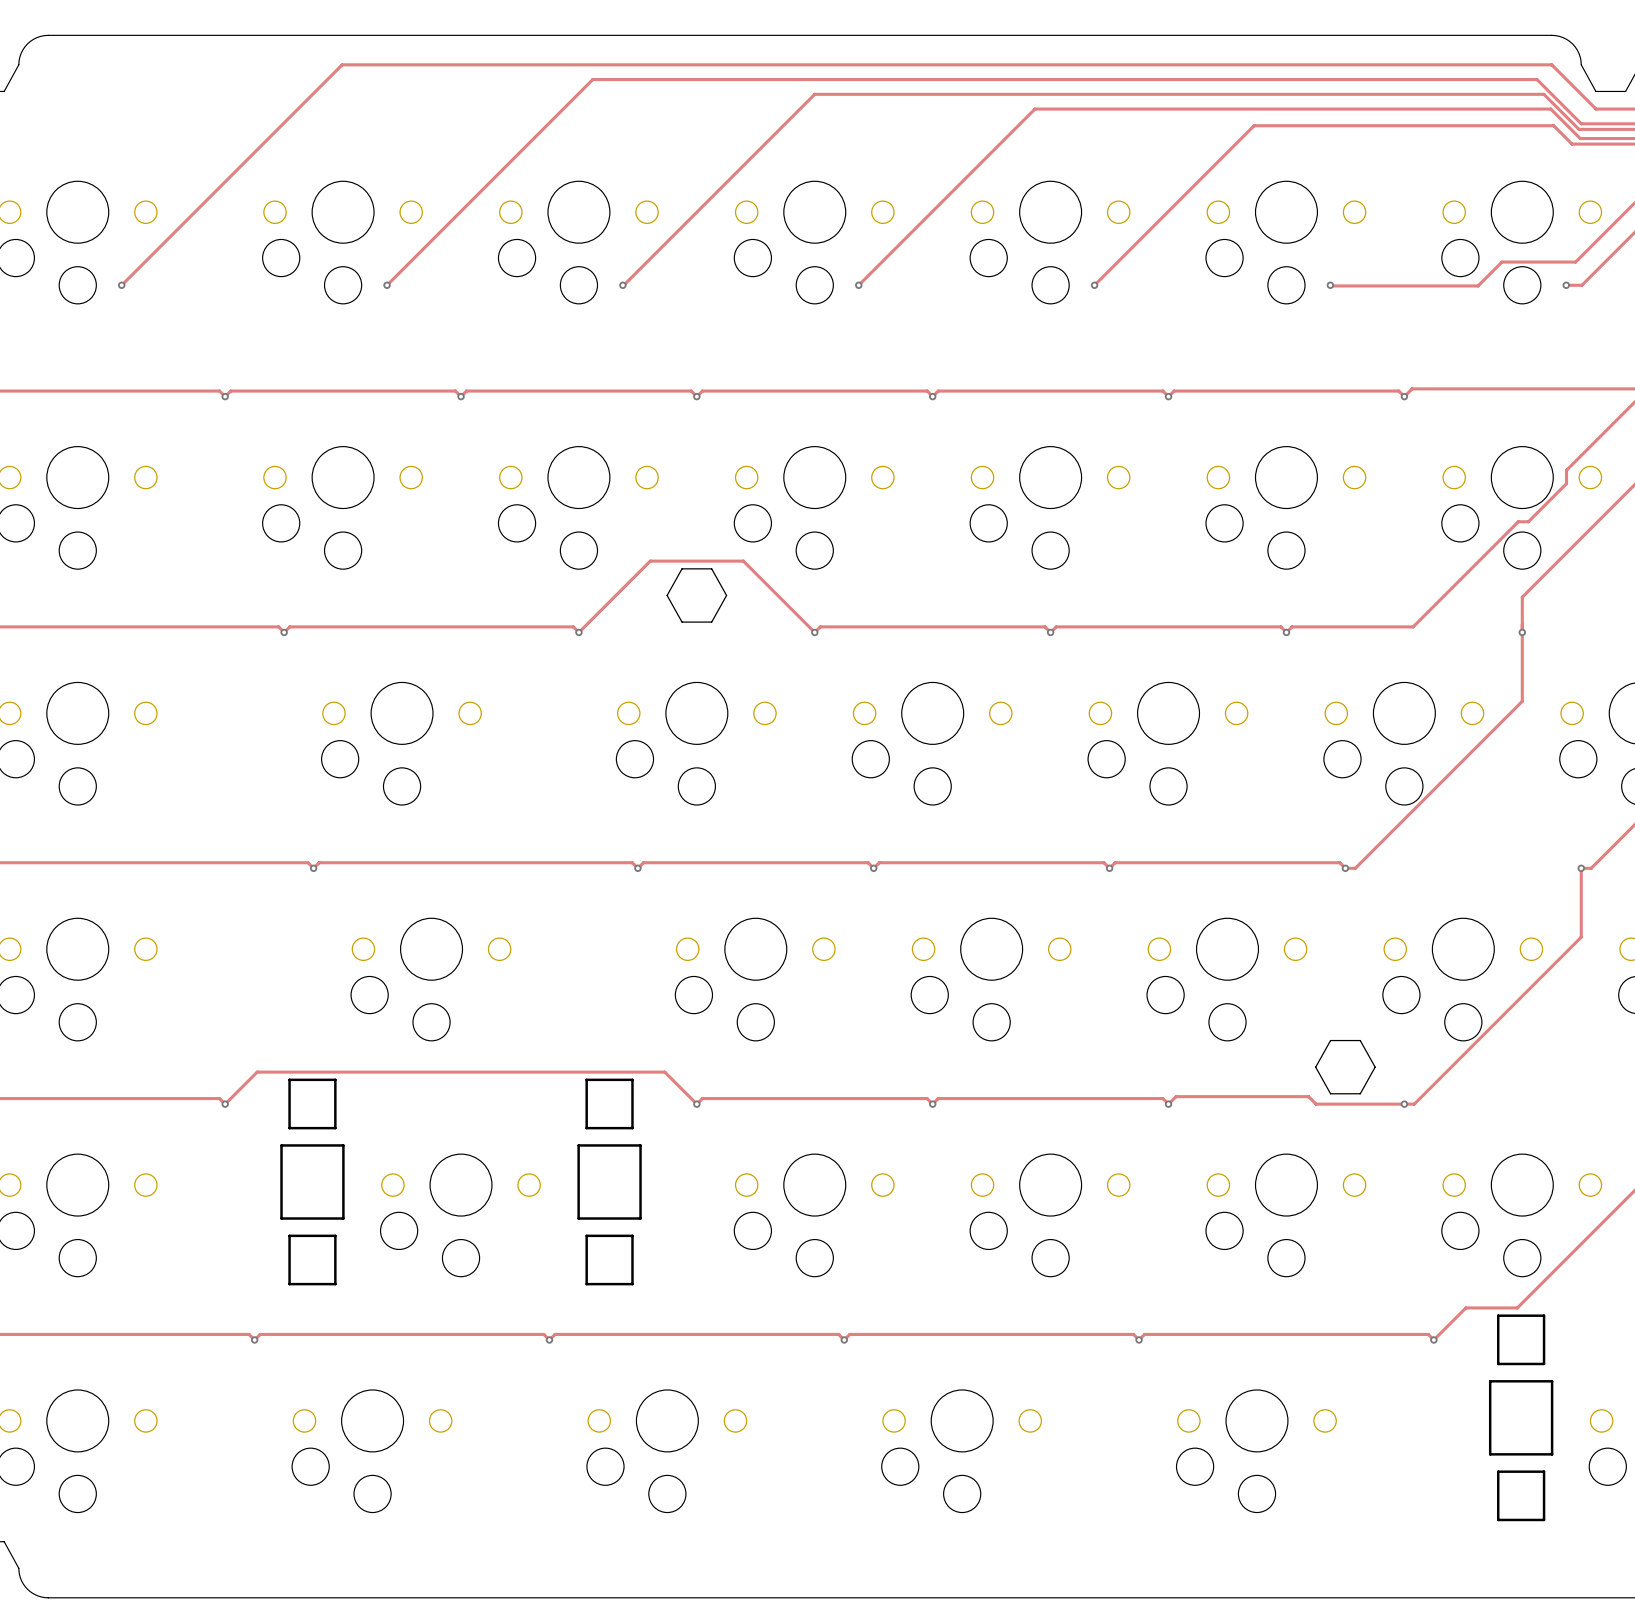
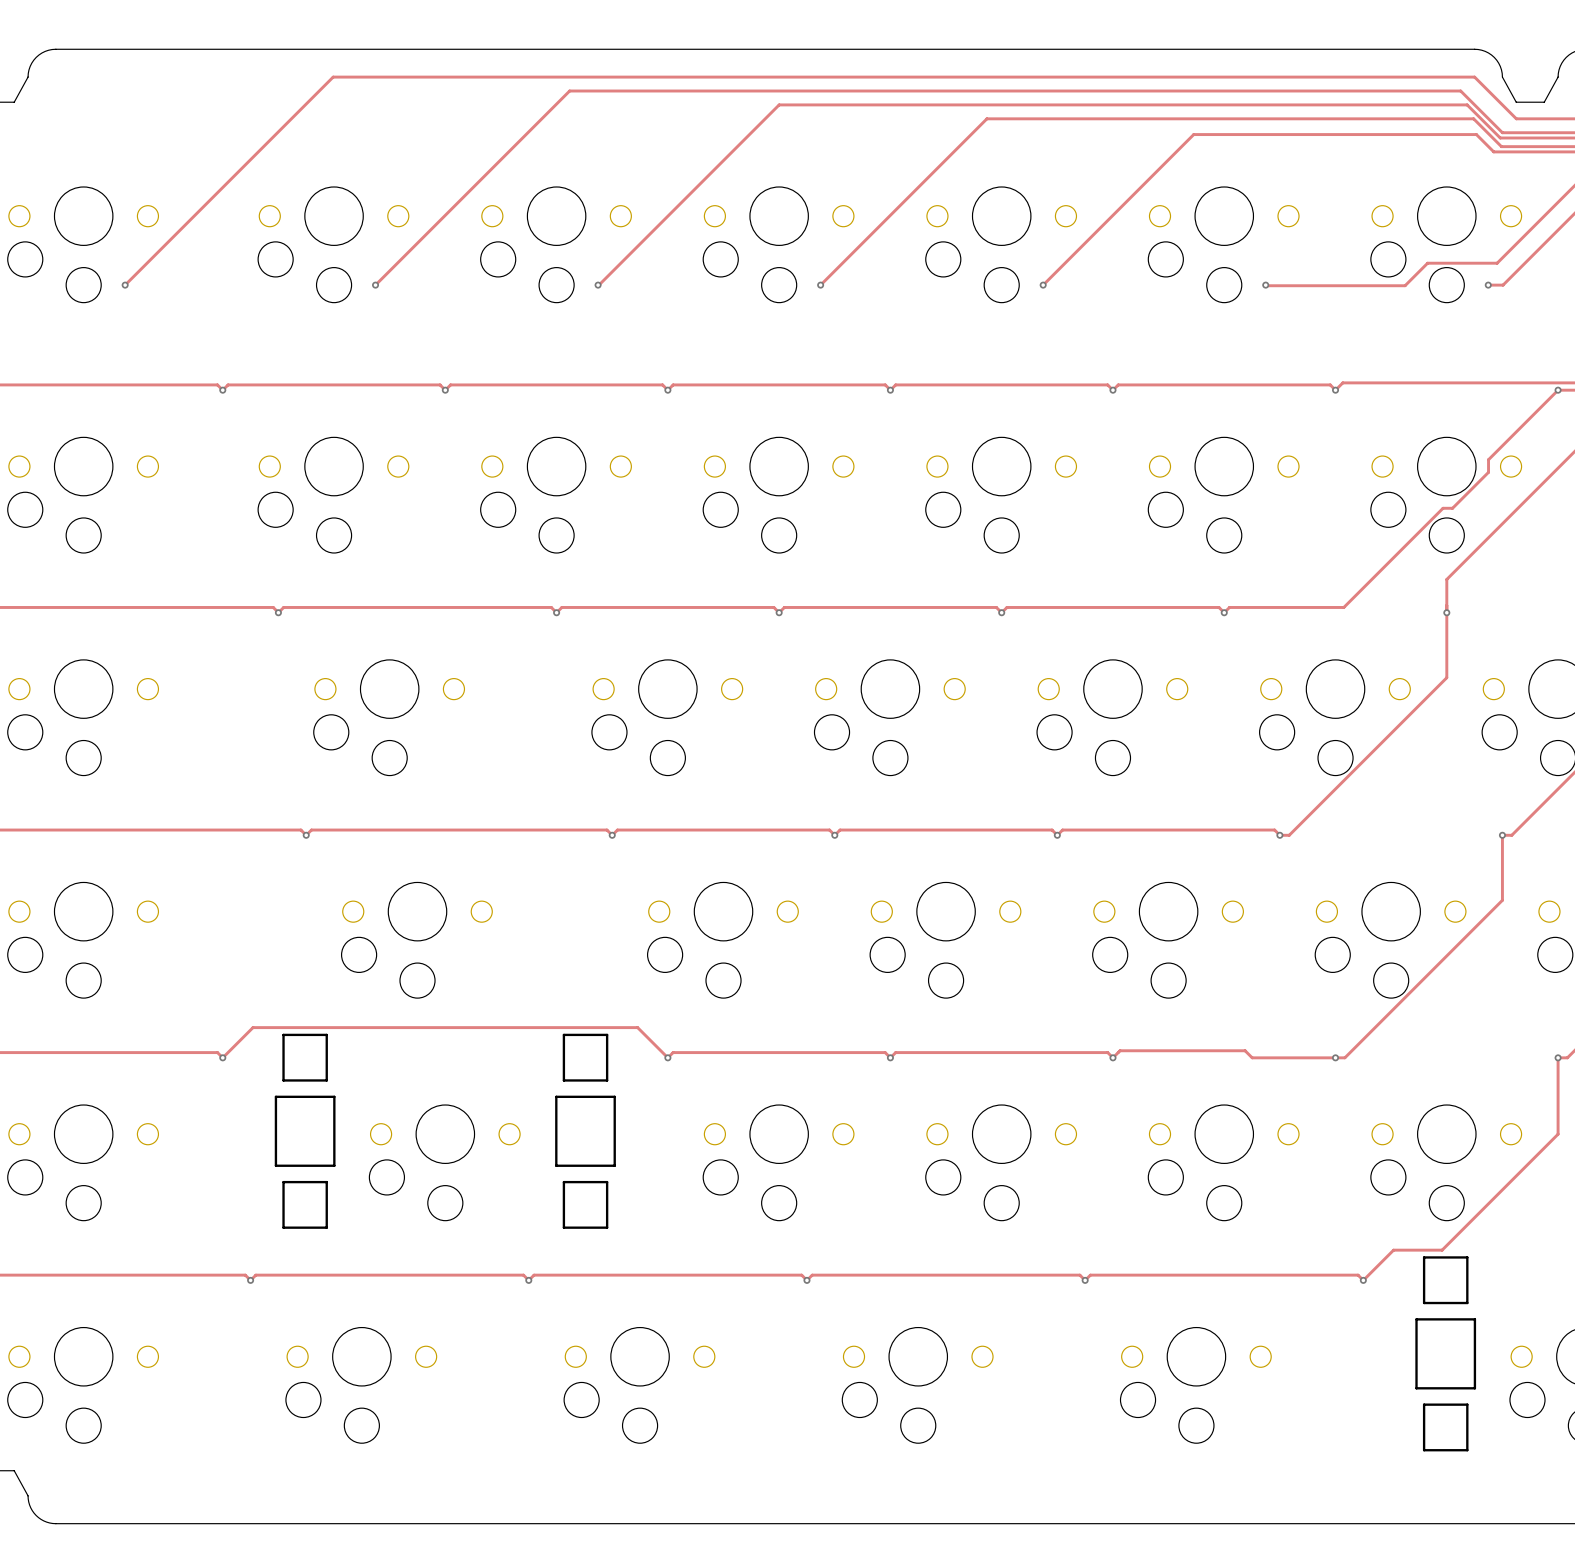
drawing: [666, 568, 728, 623] -> none
track: (584, 626) (650, 561) (743, 561) (809, 626) -> (561, 607) (773, 607)
drawing: [1315, 1039, 1376, 1095] -> none

